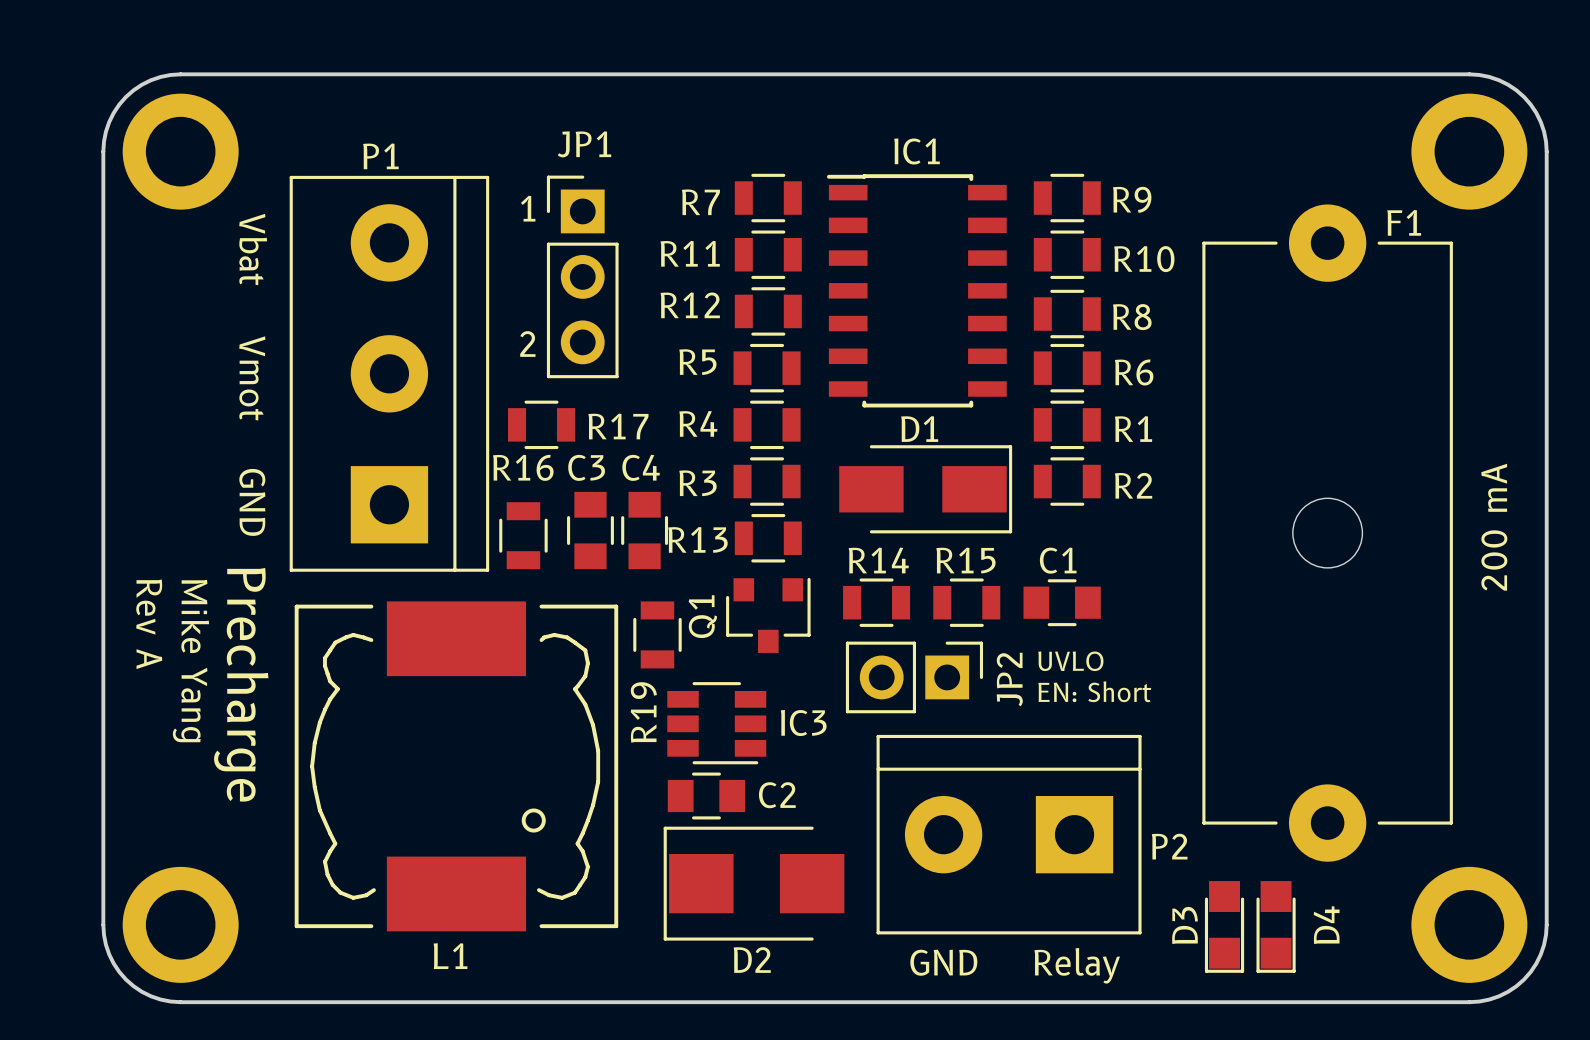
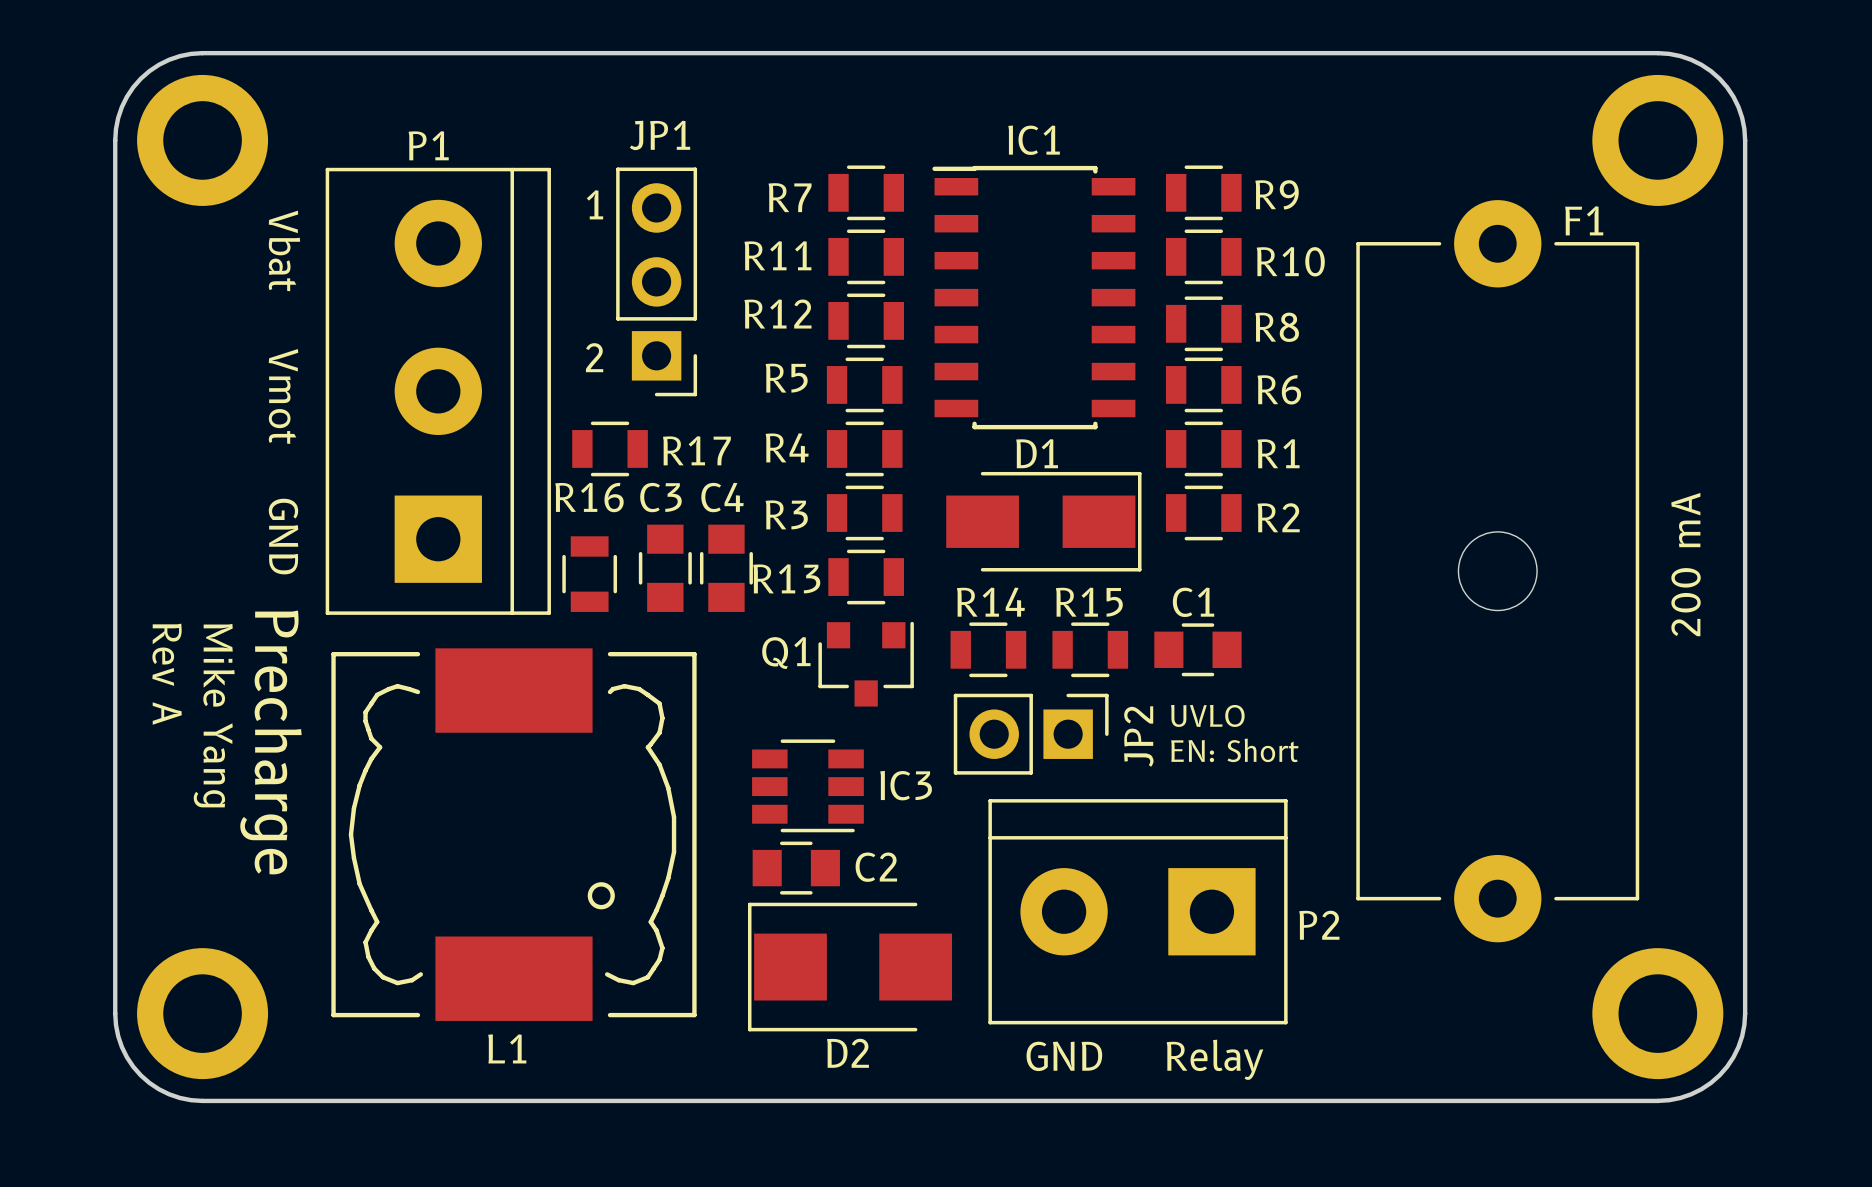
JP1 rotation: 0° (582, 276) -> 180° (656, 281)
Q1 name rotation: 0° (702, 616) -> 90° clockwise (786, 653)
R19: (657, 634) -> none
D3: (1224, 926) -> none
D4: (1276, 926) -> none

